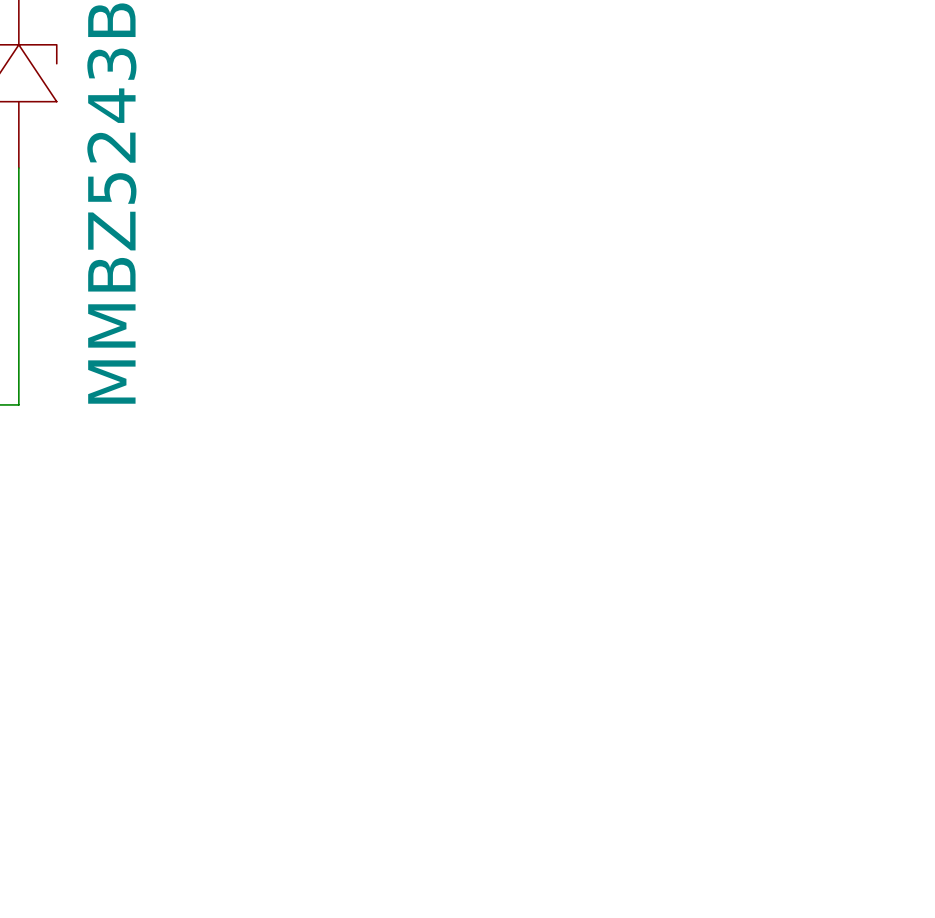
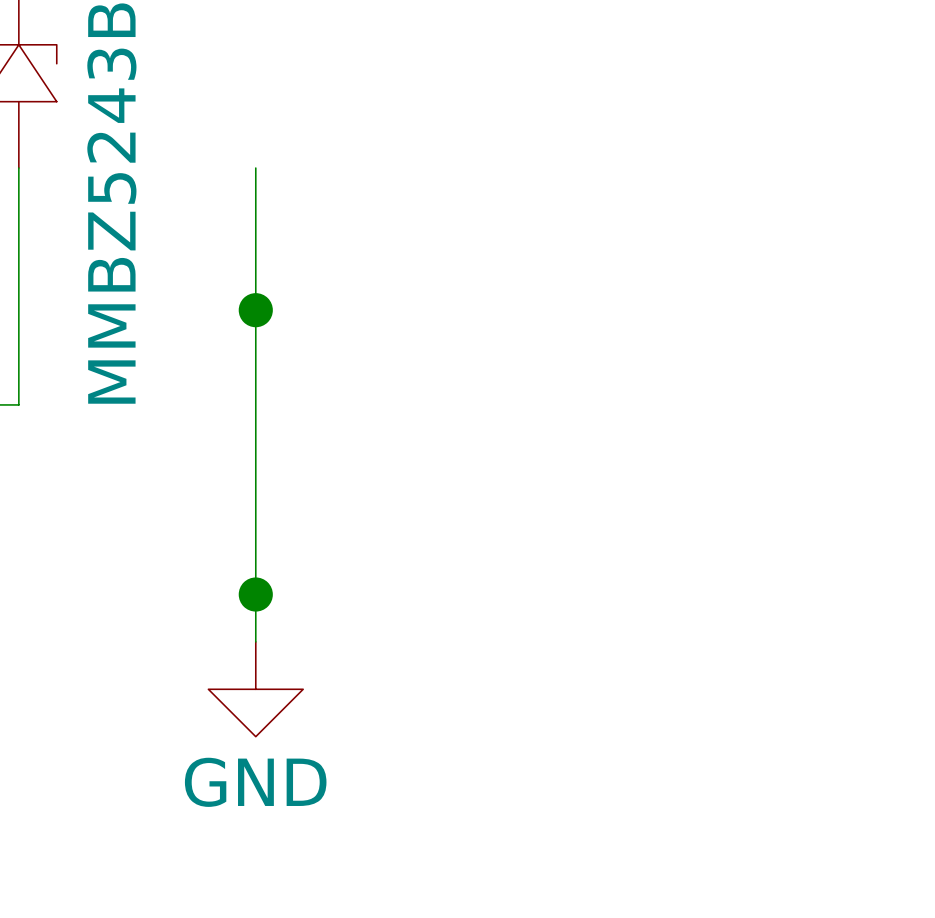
wire: none -> (255, 168) (255, 641)
junction: none -> (255, 310)
junction: none -> (255, 594)
power symbol: none -> GND (255, 689)

